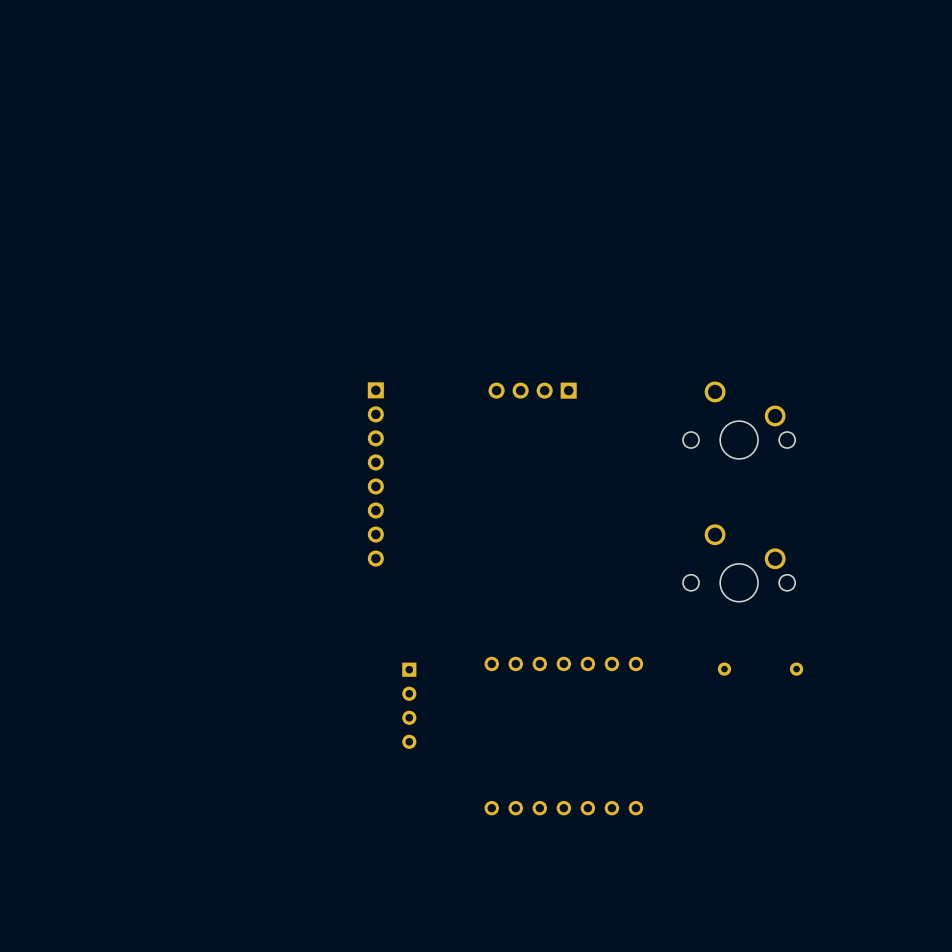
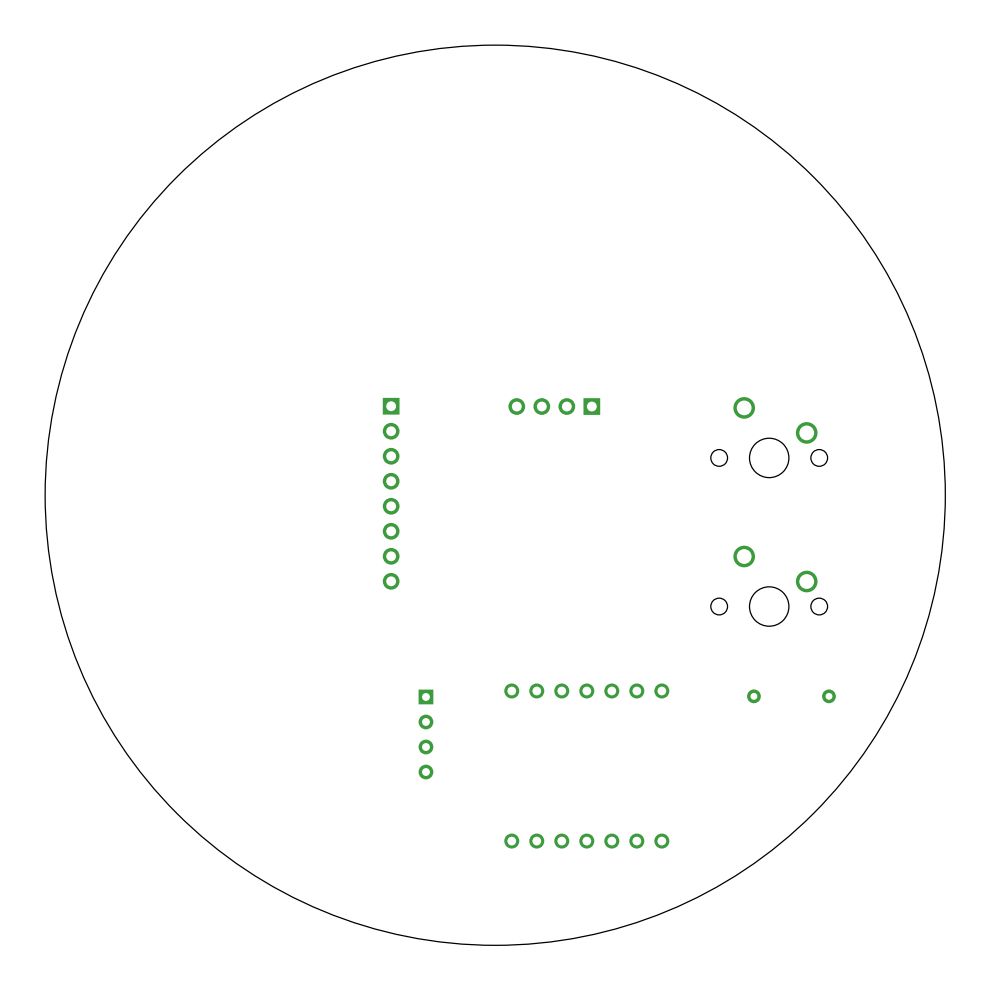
round board edge: none -> [44, 44, 946, 946]

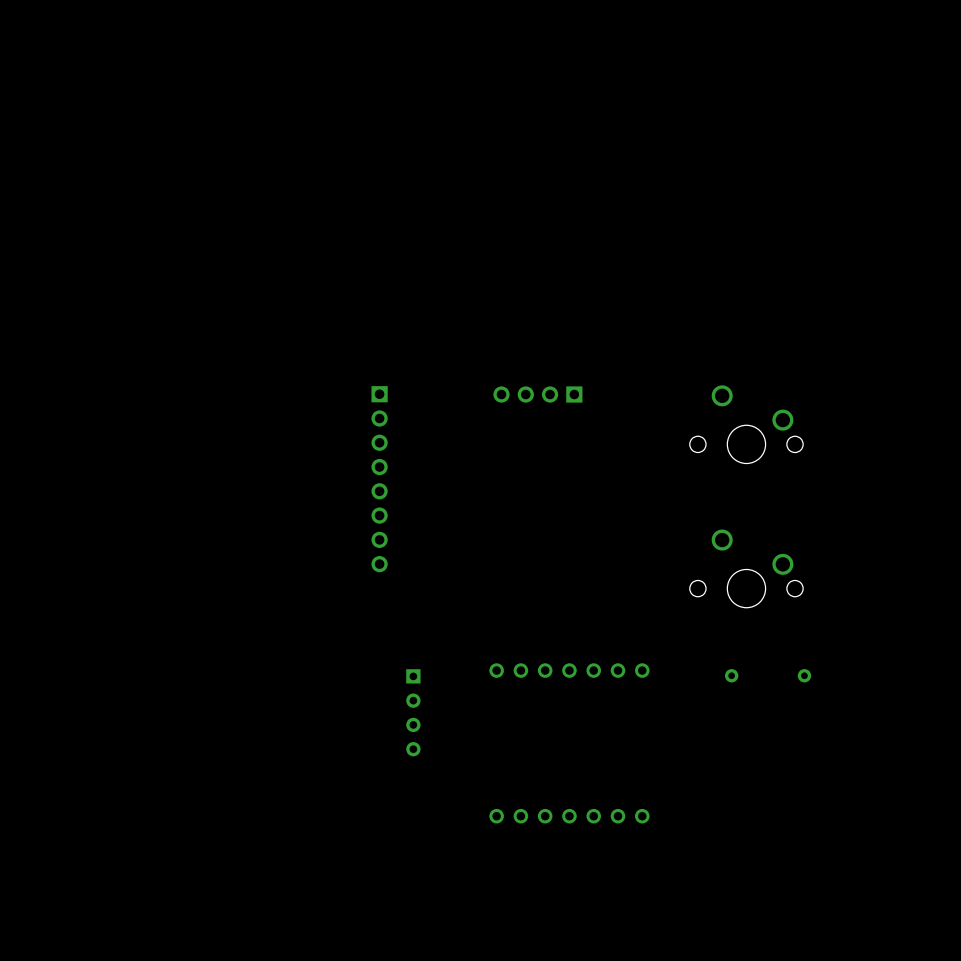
round board edge: [44, 44, 946, 946] -> none

